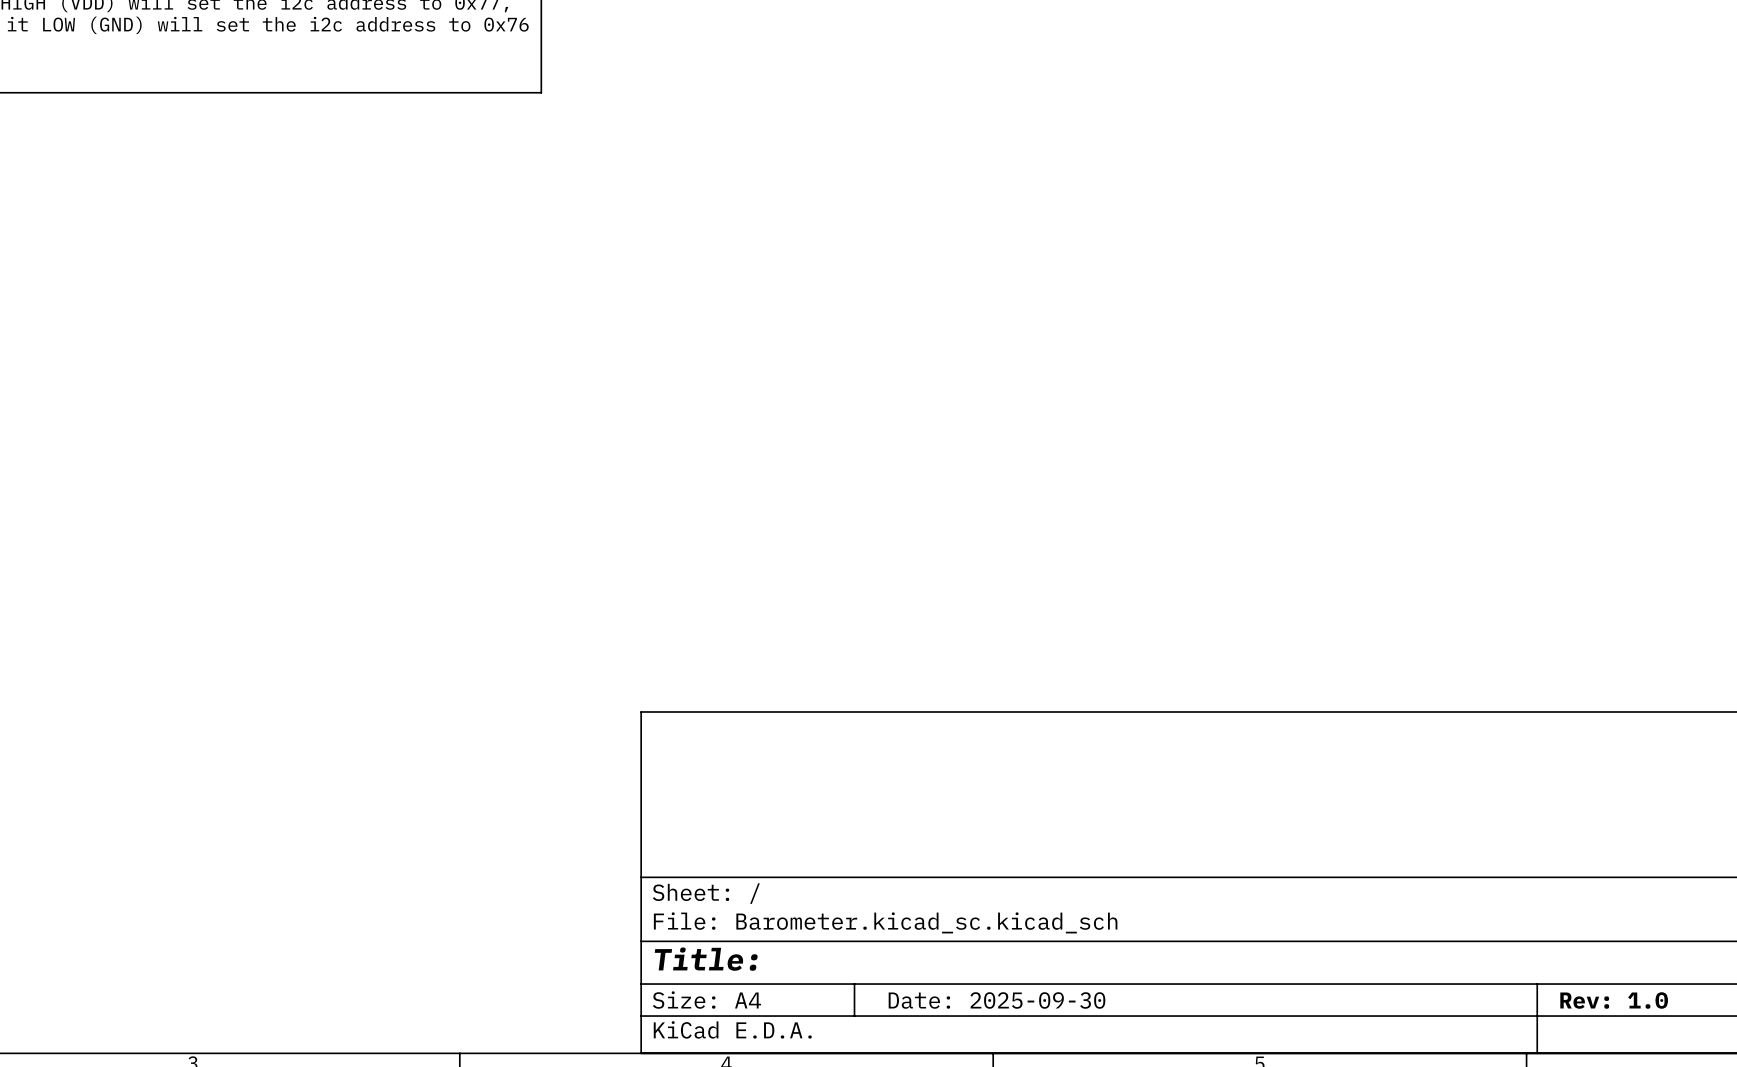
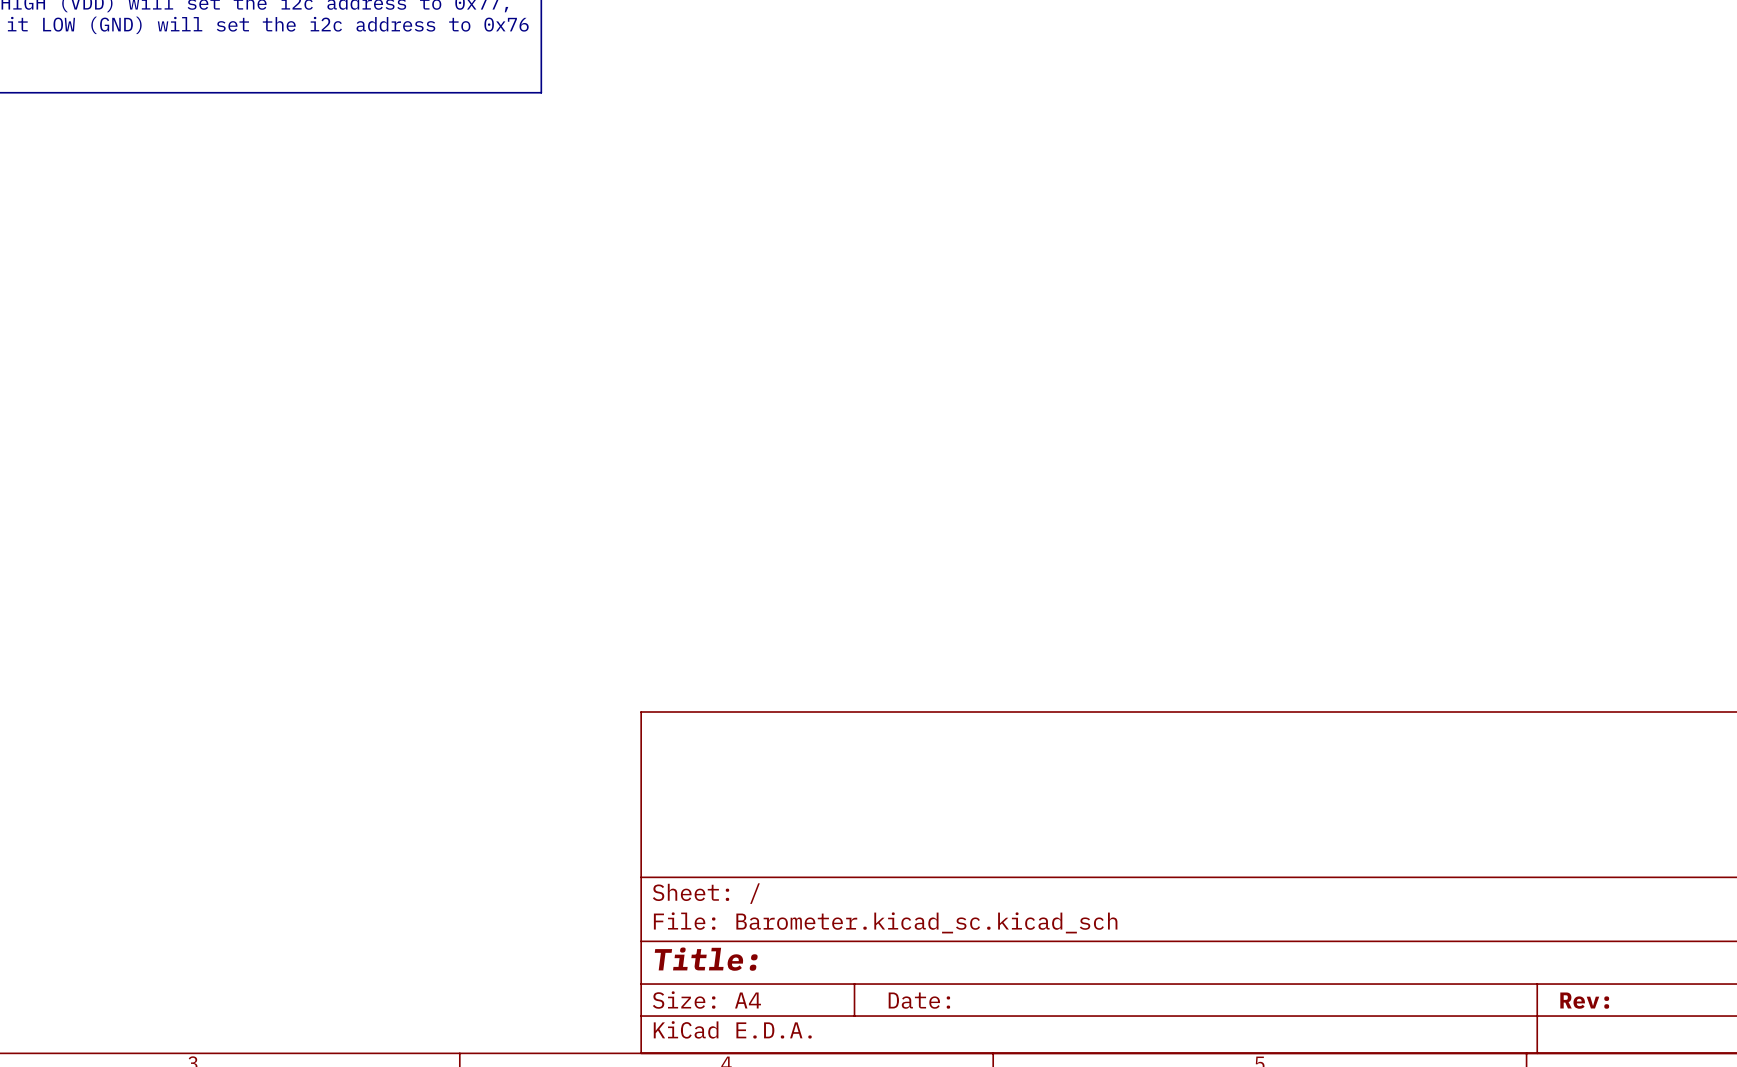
title block: Date: 2025-09-30 (997, 1000) -> Date: (919, 1000)
title block: Rev: 1.0 (1614, 1000) -> Rev: (1584, 1000)

